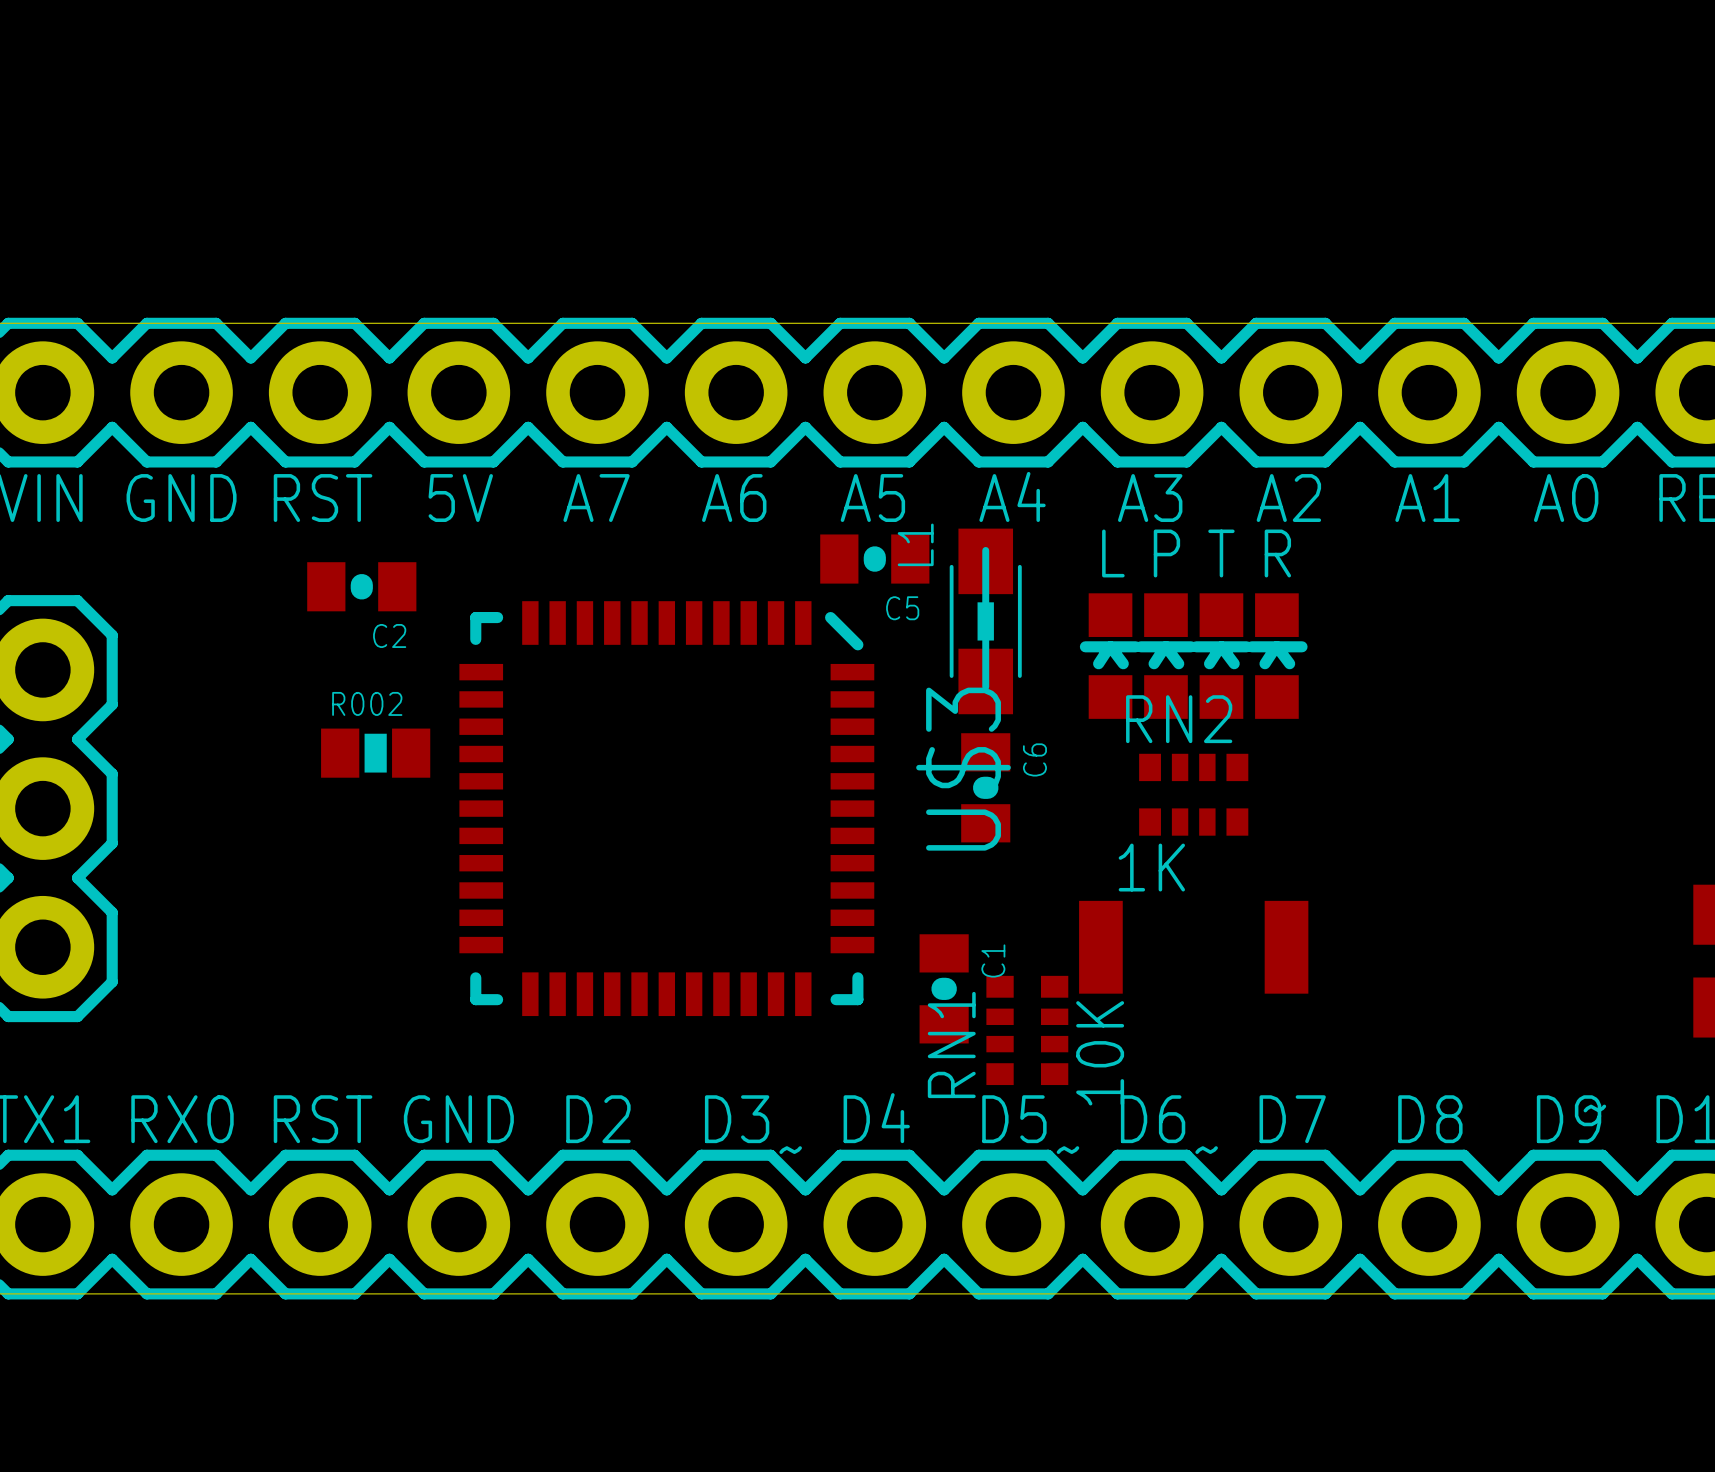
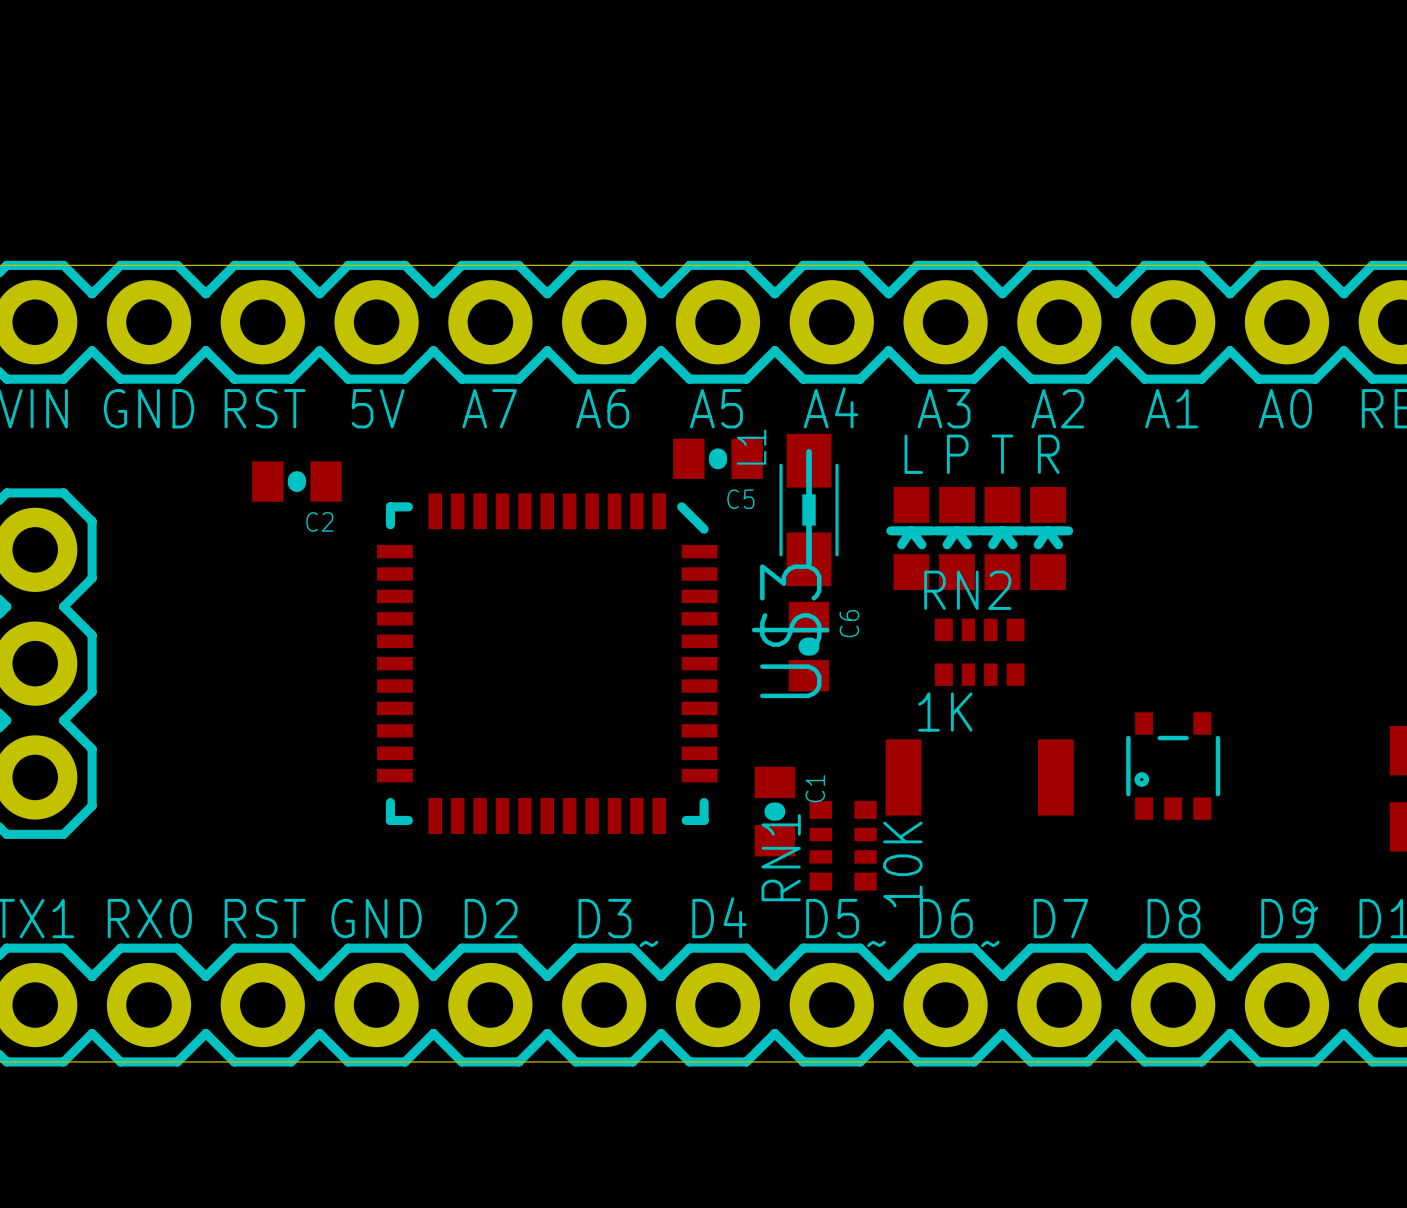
R002: (375, 753) -> none
part: none -> (1173, 766)

